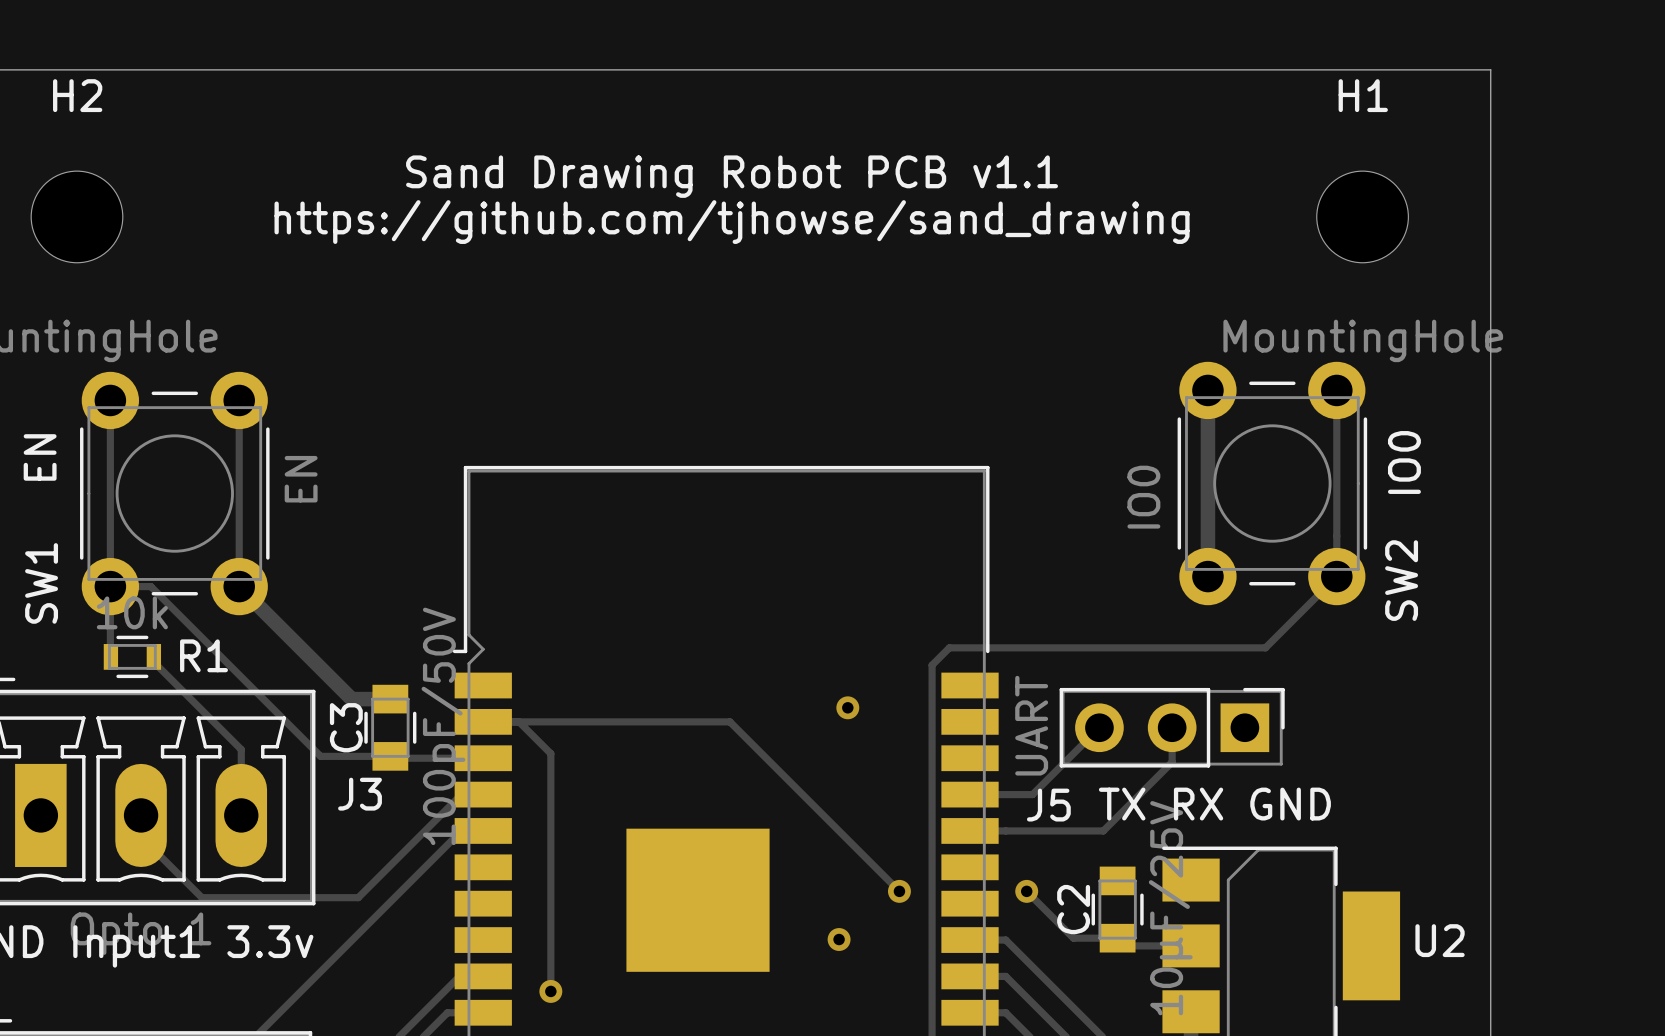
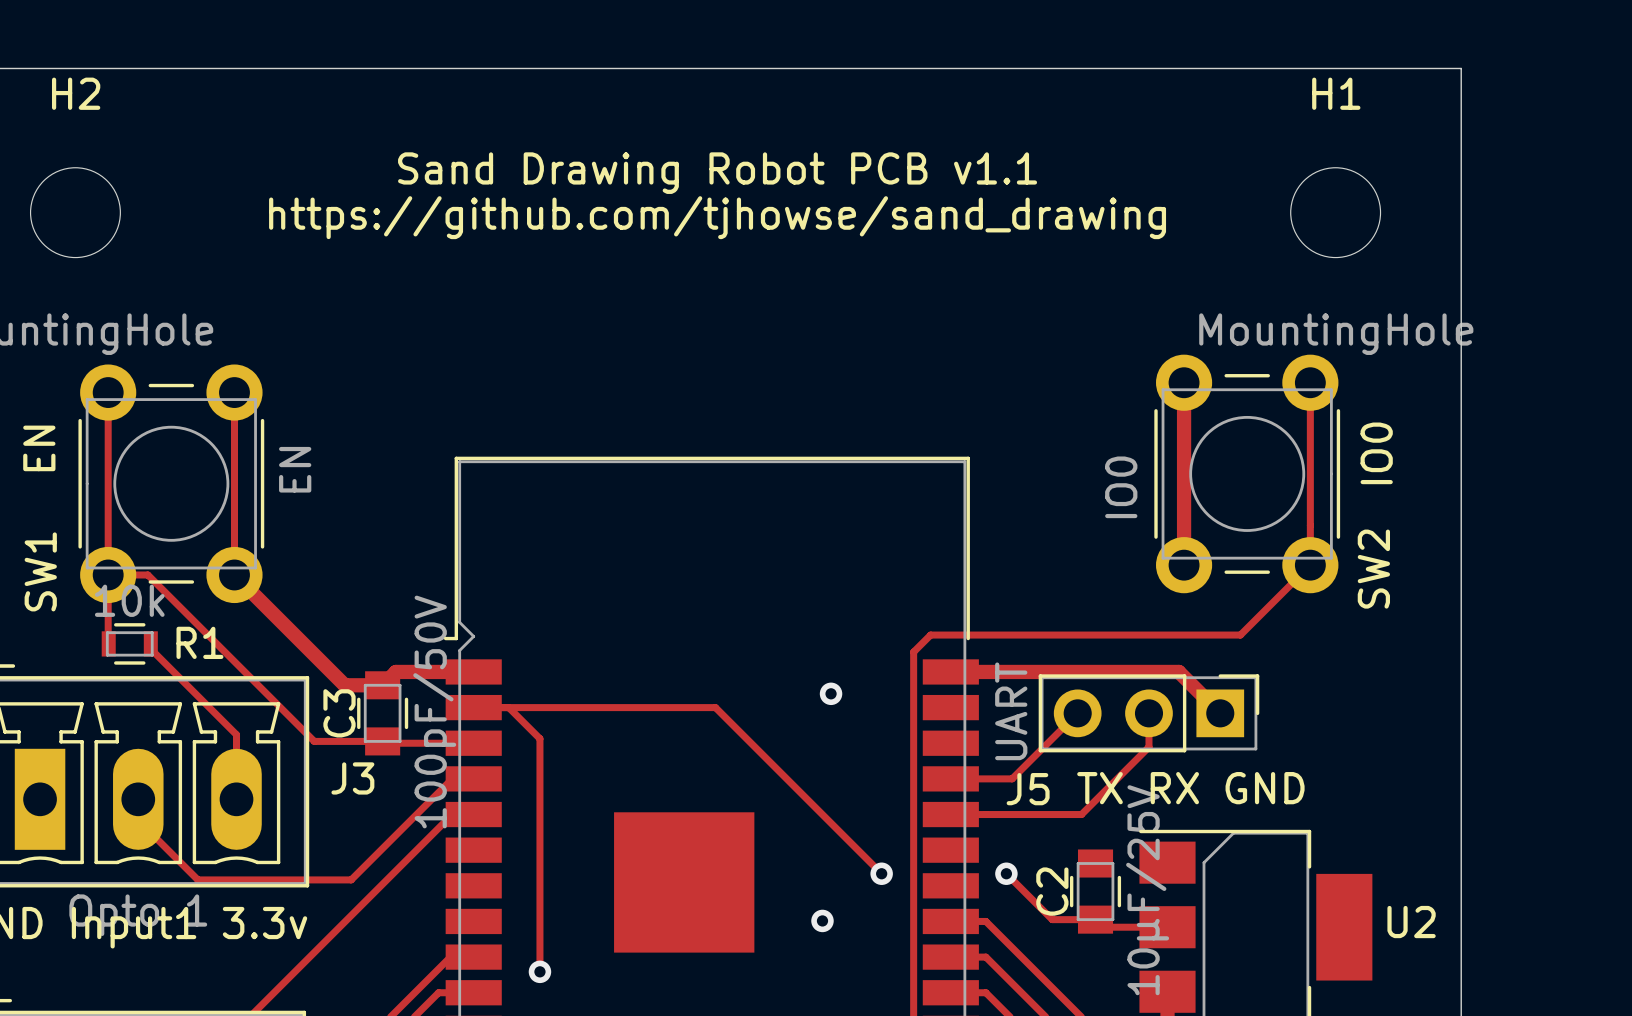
track: none -> (473, 671) (395, 671) (382, 685)
track: none -> (950, 671) (1178, 671) (1220, 713)

